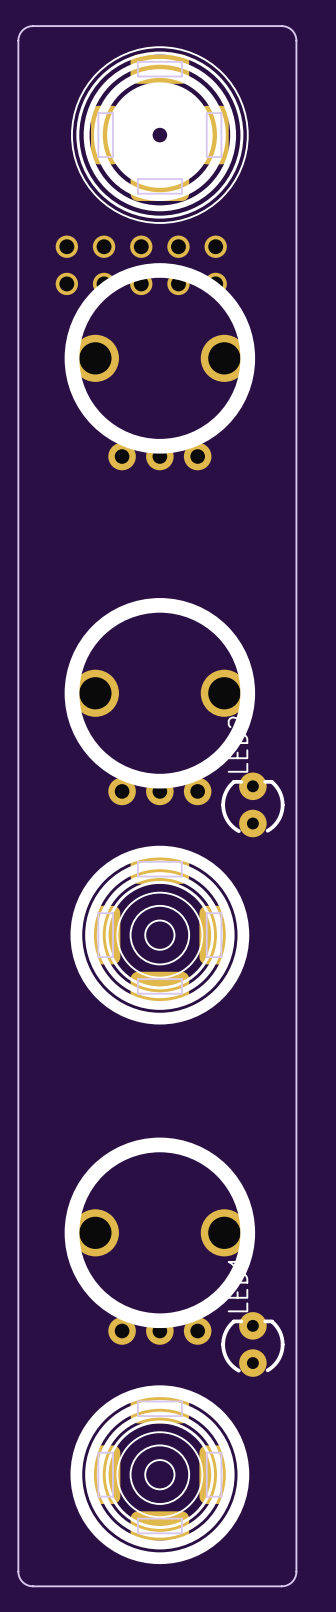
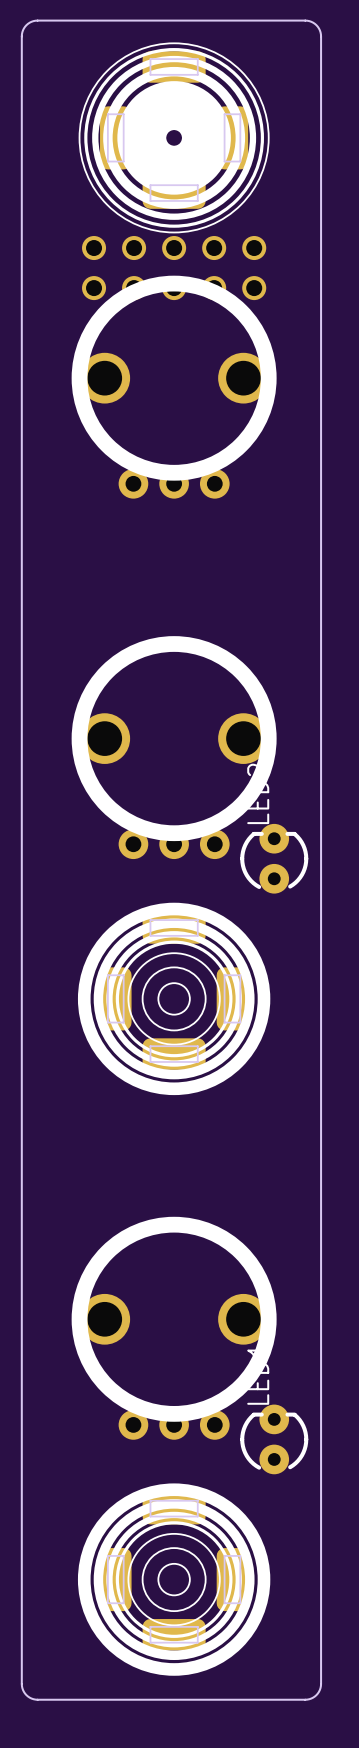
part position: (141, 265) -> (174, 268)

